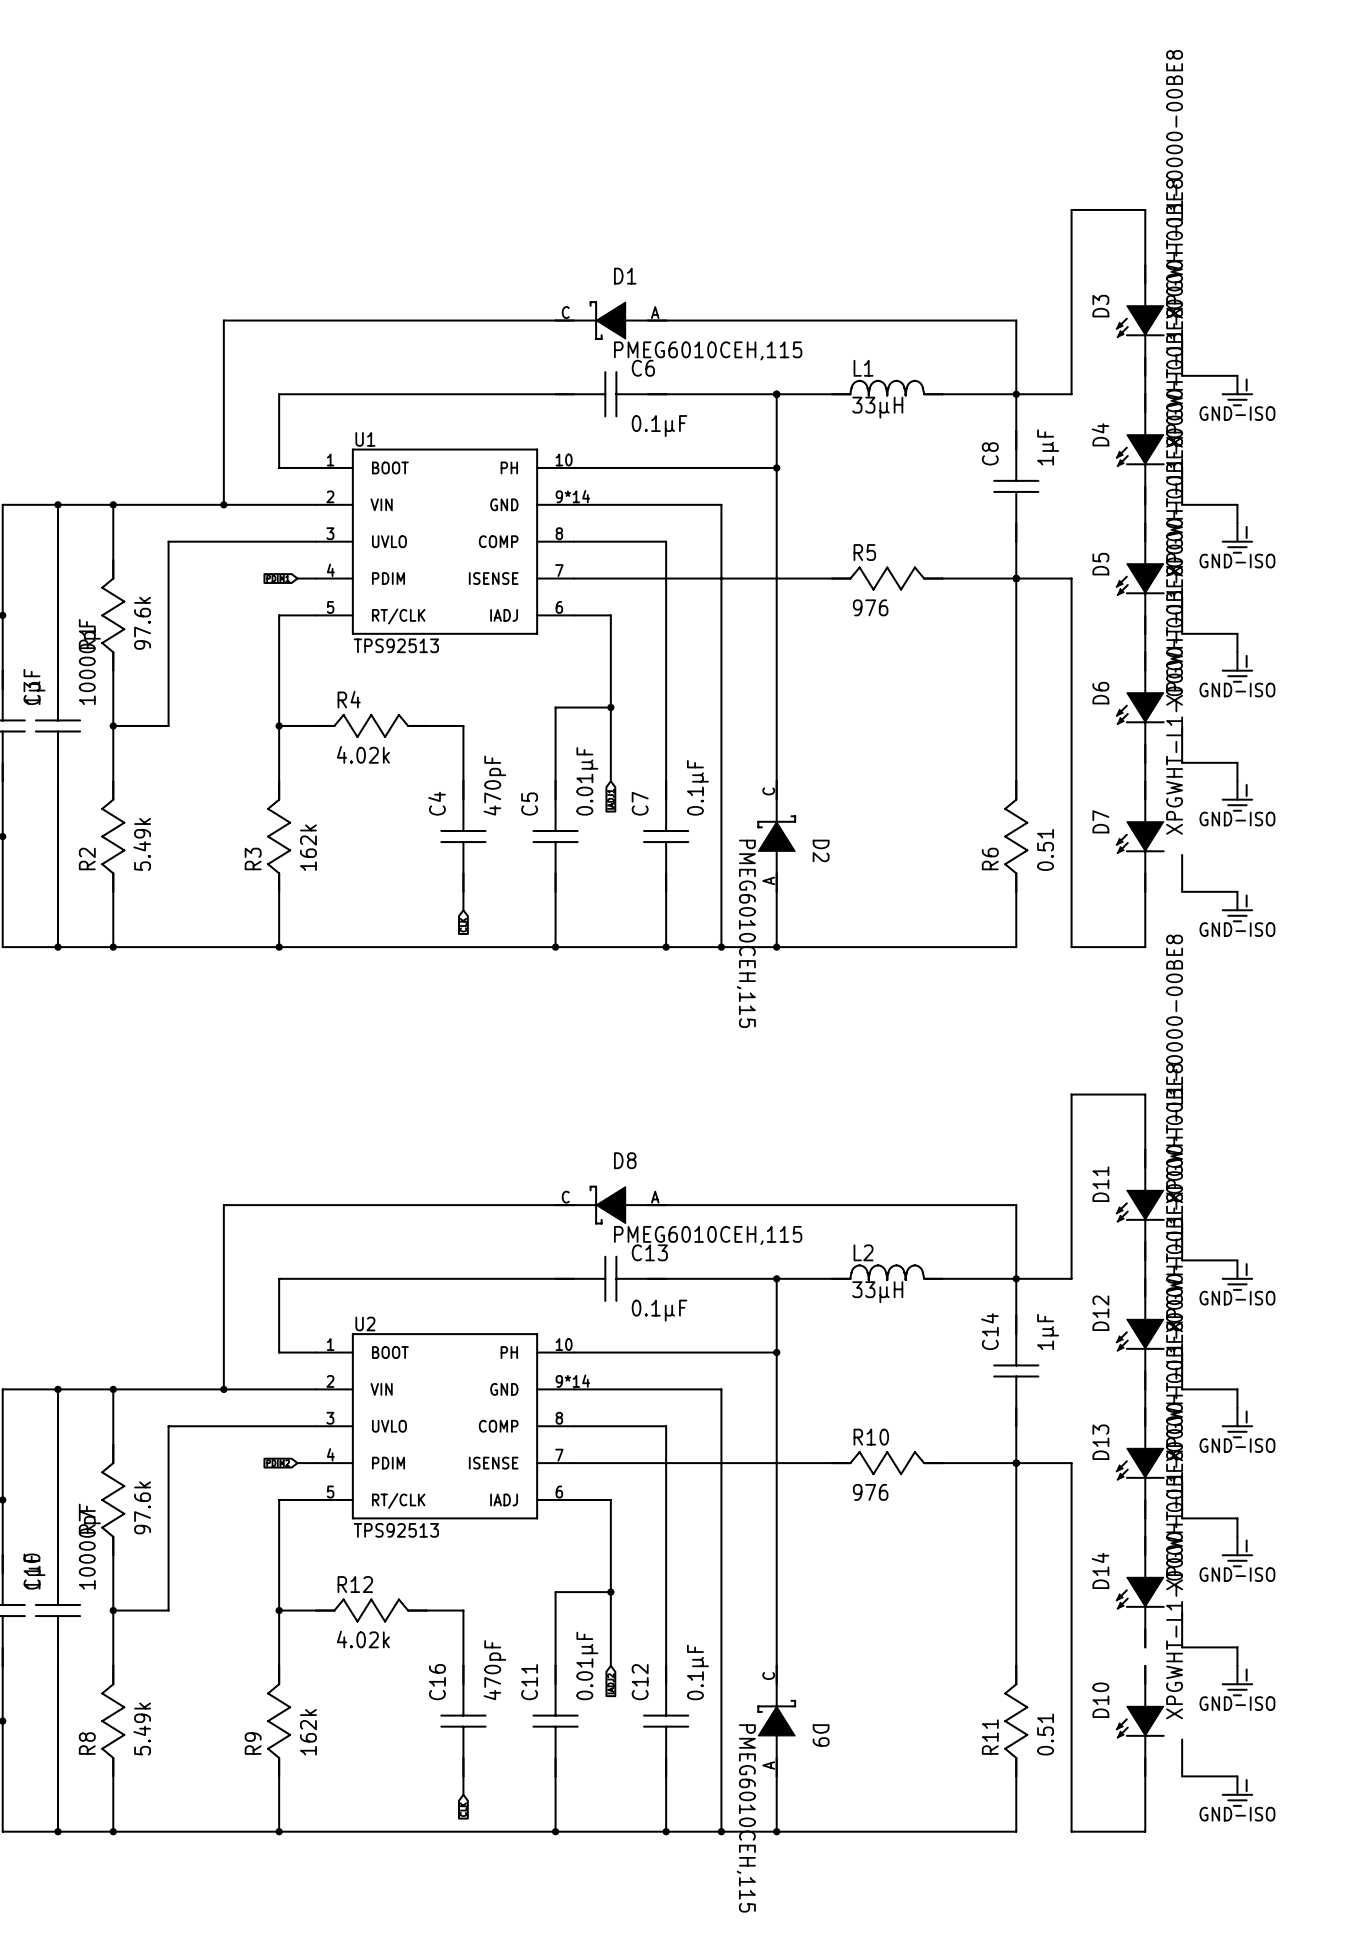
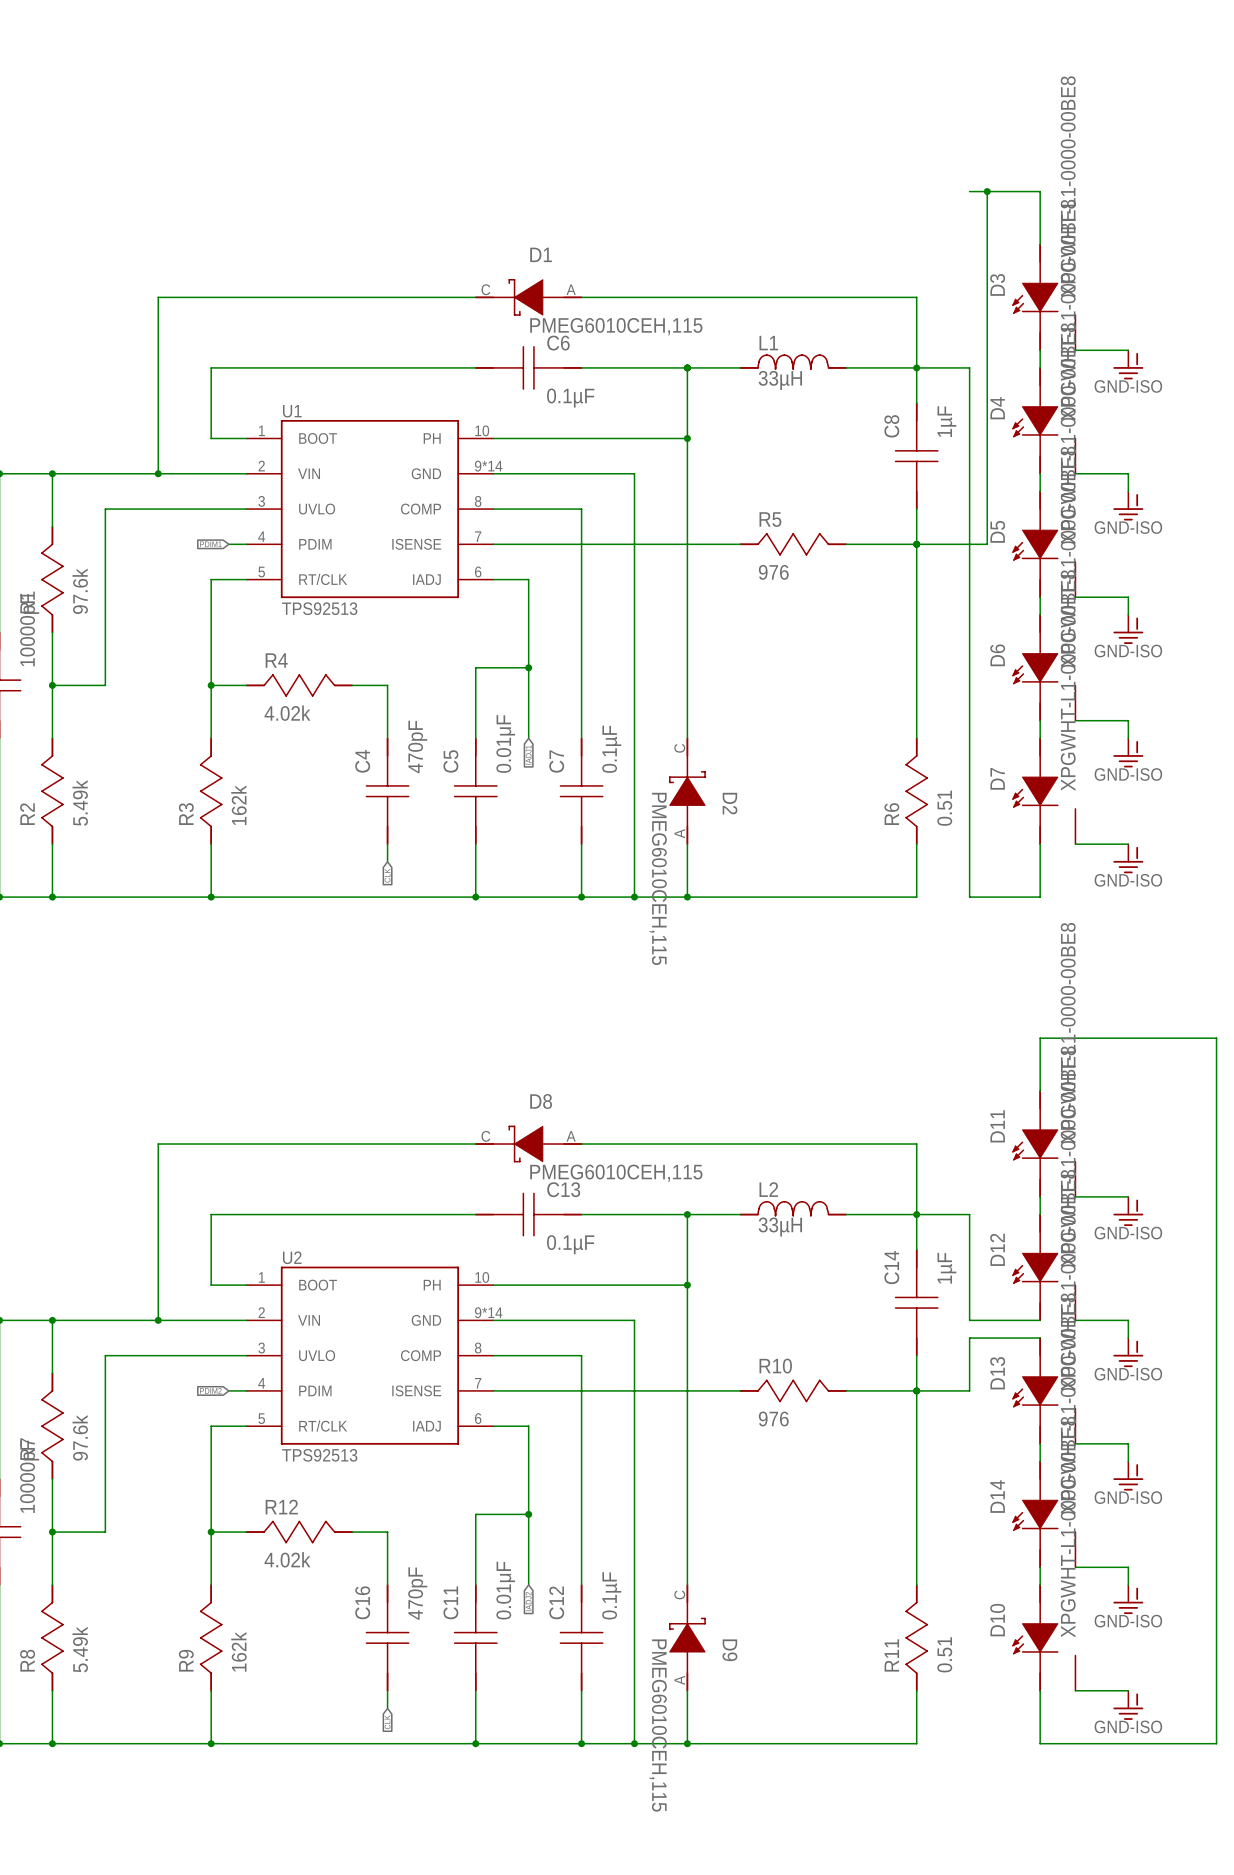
wire: (1071, 209) (1071, 394) -> (987, 191) (987, 544) (969, 544) (969, 367)
junction: none -> (987, 191)
wire: (1145, 1094) (1071, 1094) (1071, 1278) -> (1040, 1320) (969, 1320) (969, 1214)
wire: (1145, 1389) (1145, 1407) -> (969, 1390) (969, 1338) (1040, 1338)
wire: (1071, 1463) (1071, 1831) (1145, 1831) -> (1040, 1038) (1216, 1038) (1216, 1743) (1040, 1743)
wire: none -> (1040, 1567) (1040, 1584)

